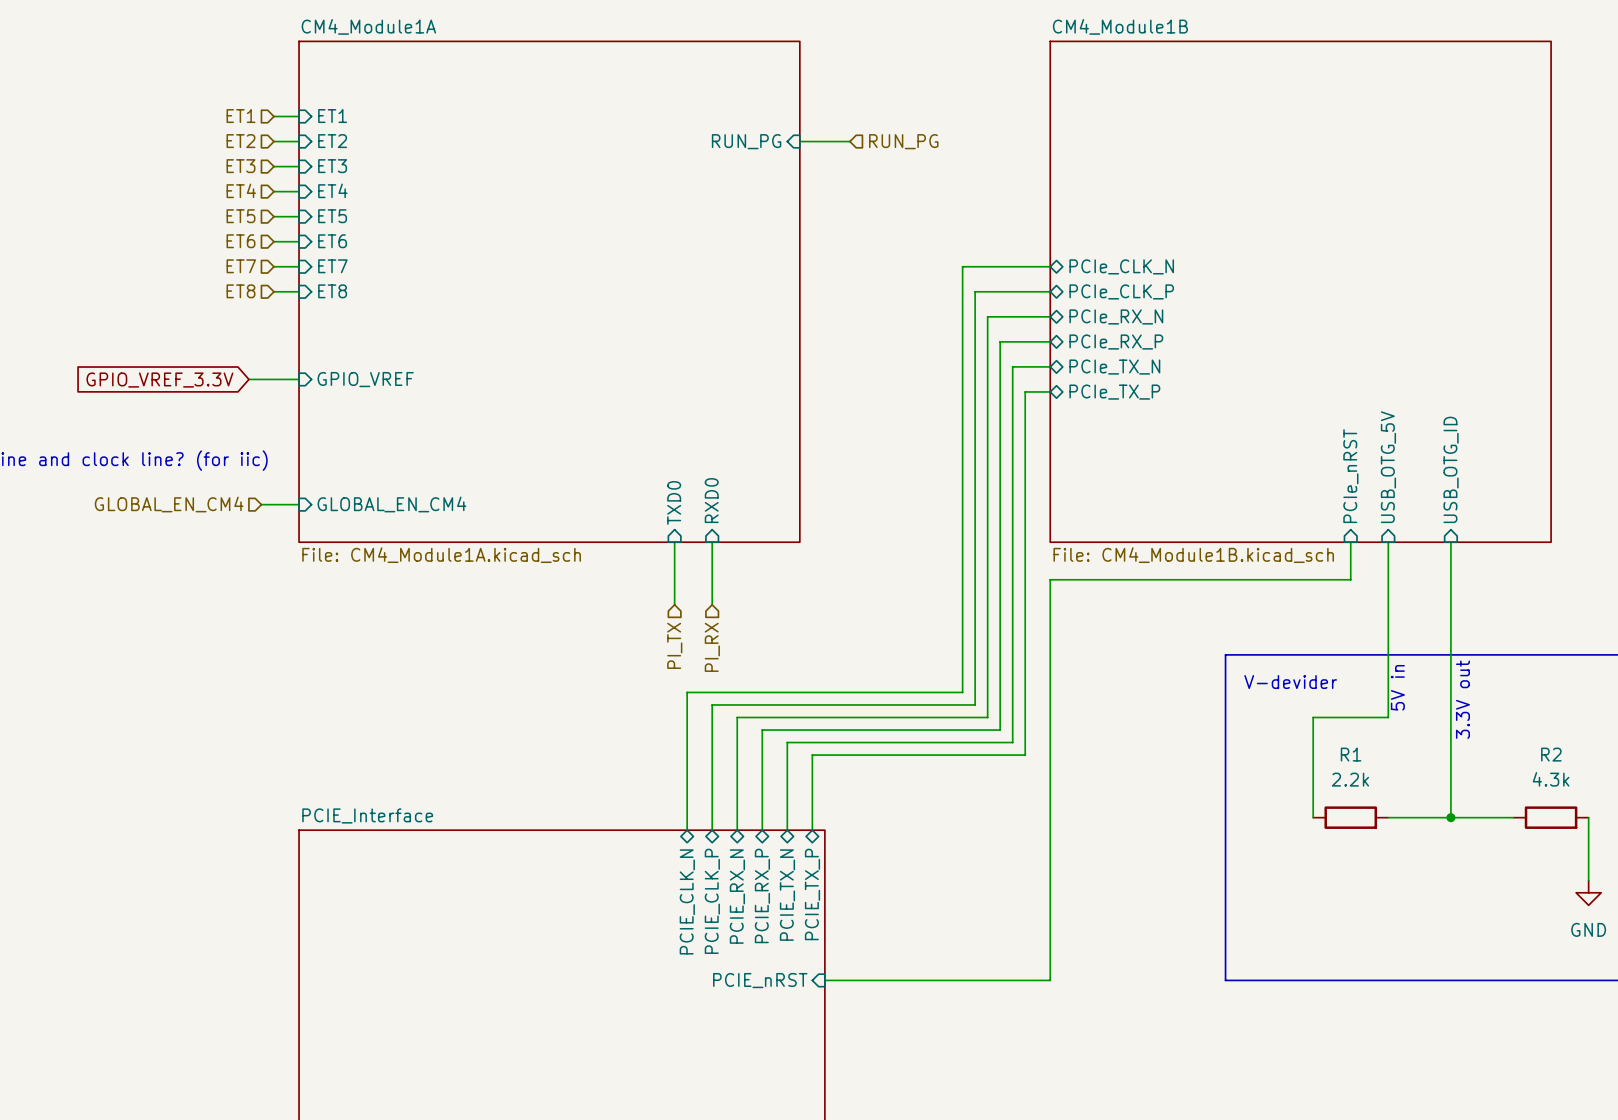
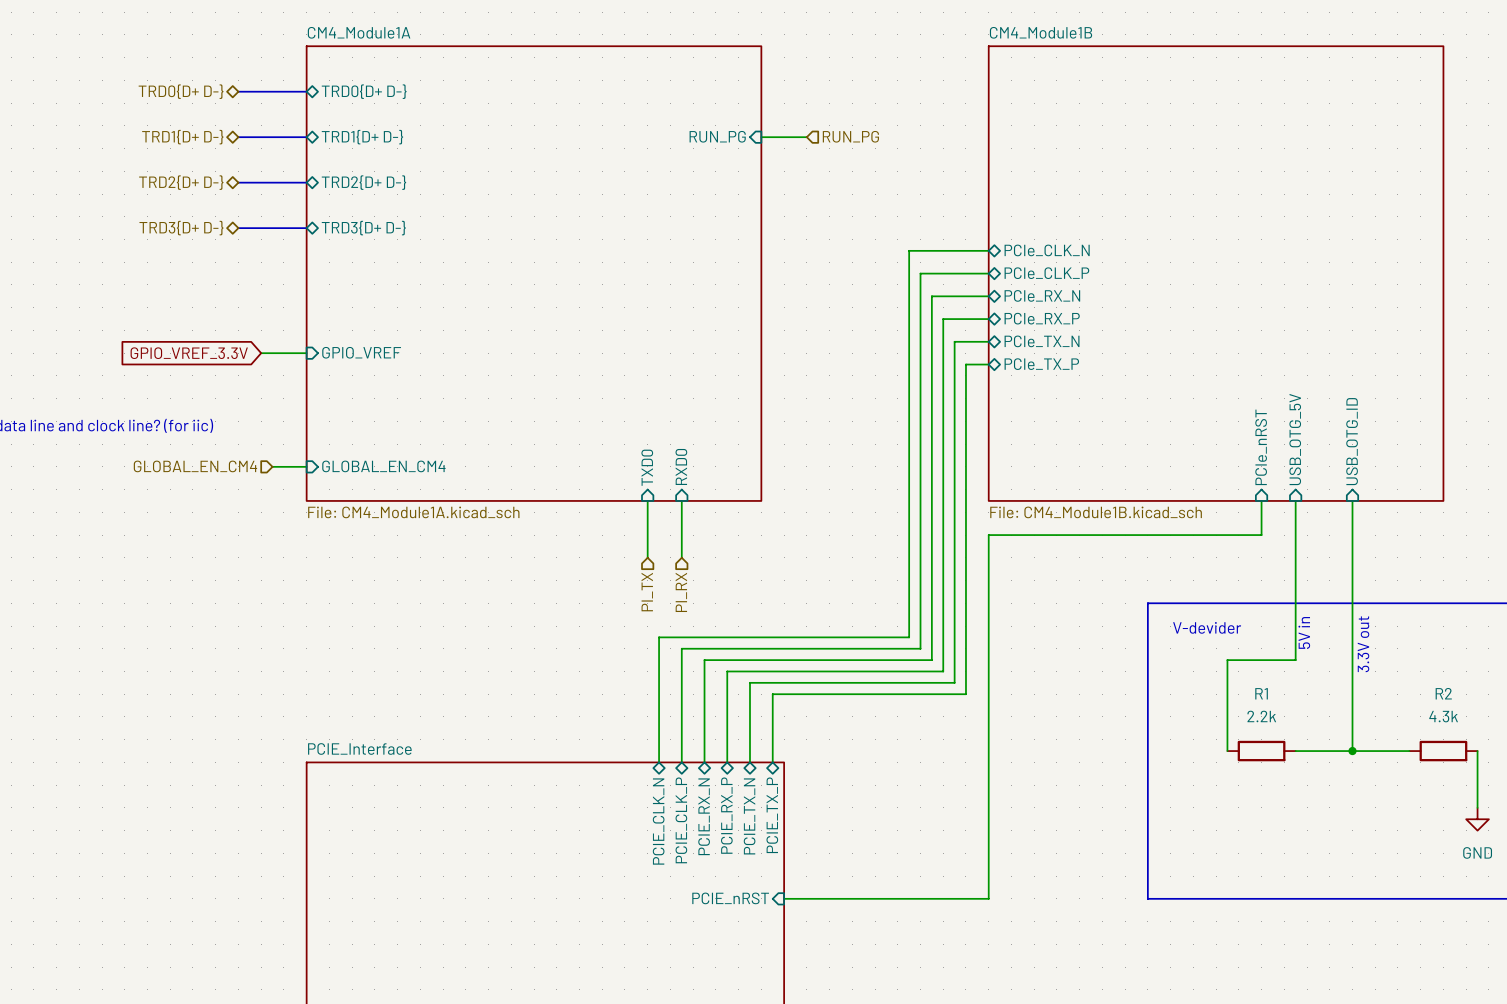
bus: none -> (238, 91) (306, 91)
hierarchical label: none -> TRD0{D+ D-} (181, 91)
sheet pin: none -> TRD0{D+ D-} (364, 91)
hierarchical label: ET1 (240, 116) -> none
wire: (273, 116) (299, 116) -> none
sheet pin: ET1 (332, 116) -> none
bus: none -> (238, 137) (306, 137)
hierarchical label: ET2 (240, 141) -> none
sheet pin shape: input (332, 141) -> bidirectional (362, 137)
sheet pin: ET2 (332, 141) -> TRD1{D+ D-} (362, 137)
hierarchical label: none -> TRD1{D+ D-} (182, 137)
hierarchical label: ET3 (240, 166) -> none
wire: (273, 166) (299, 166) -> none
sheet pin: ET3 (332, 166) -> none
hierarchical label: ET4 (241, 190) -> none
sheet pin shape: input (332, 190) -> bidirectional (363, 182)
sheet pin: ET4 (332, 190) -> TRD2{D+ D-} (363, 182)
bus: none -> (238, 182) (306, 182)
hierarchical label: none -> TRD2{D+ D-} (181, 182)
hierarchical label: ET5 (240, 216) -> none
wire: (273, 216) (299, 216) -> none
sheet pin: ET5 (332, 216) -> none
bus: none -> (238, 228) (306, 228)
hierarchical label: ET6 (240, 241) -> none
sheet pin shape: input (332, 241) -> bidirectional (363, 228)
sheet pin: ET6 (332, 241) -> TRD3{D+ D-} (363, 228)
hierarchical label: none -> TRD3{D+ D-} (181, 228)
hierarchical label: ET7 (241, 266) -> none
wire: (273, 266) (299, 266) -> none
sheet pin: ET7 (332, 266) -> none
hierarchical label: ET8 (240, 291) -> none
wire: (273, 291) (299, 291) -> none
sheet pin: ET8 (332, 291) -> none

